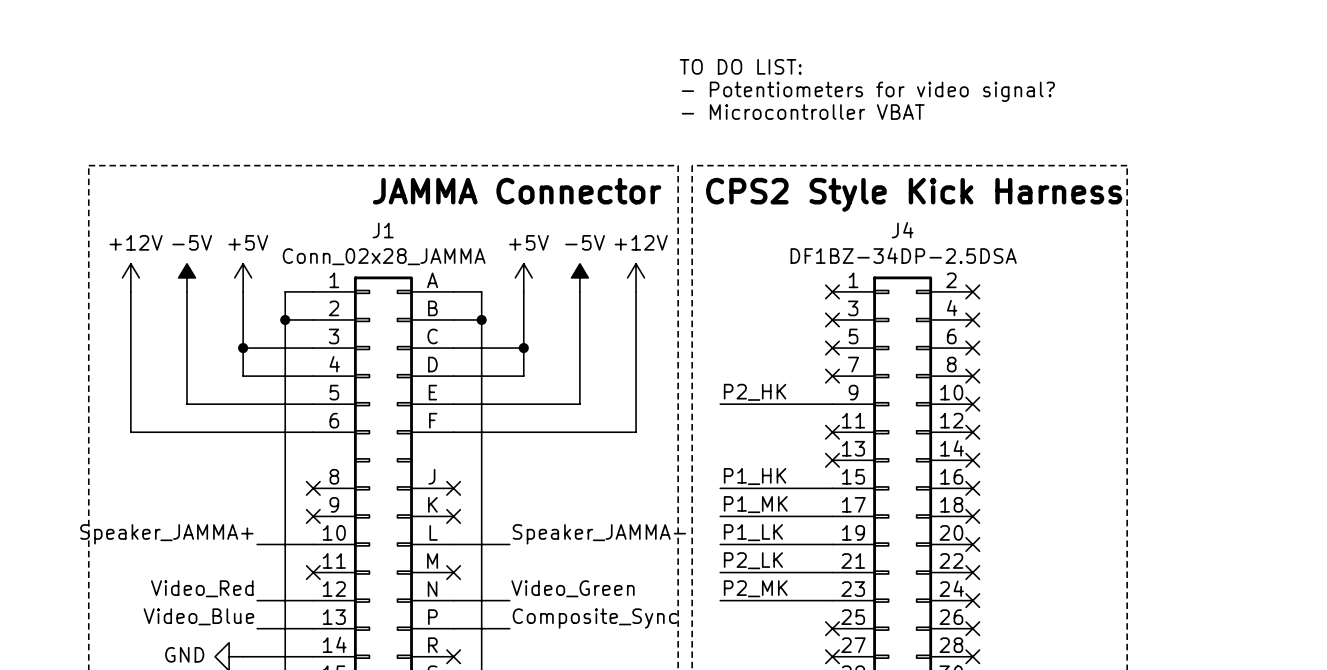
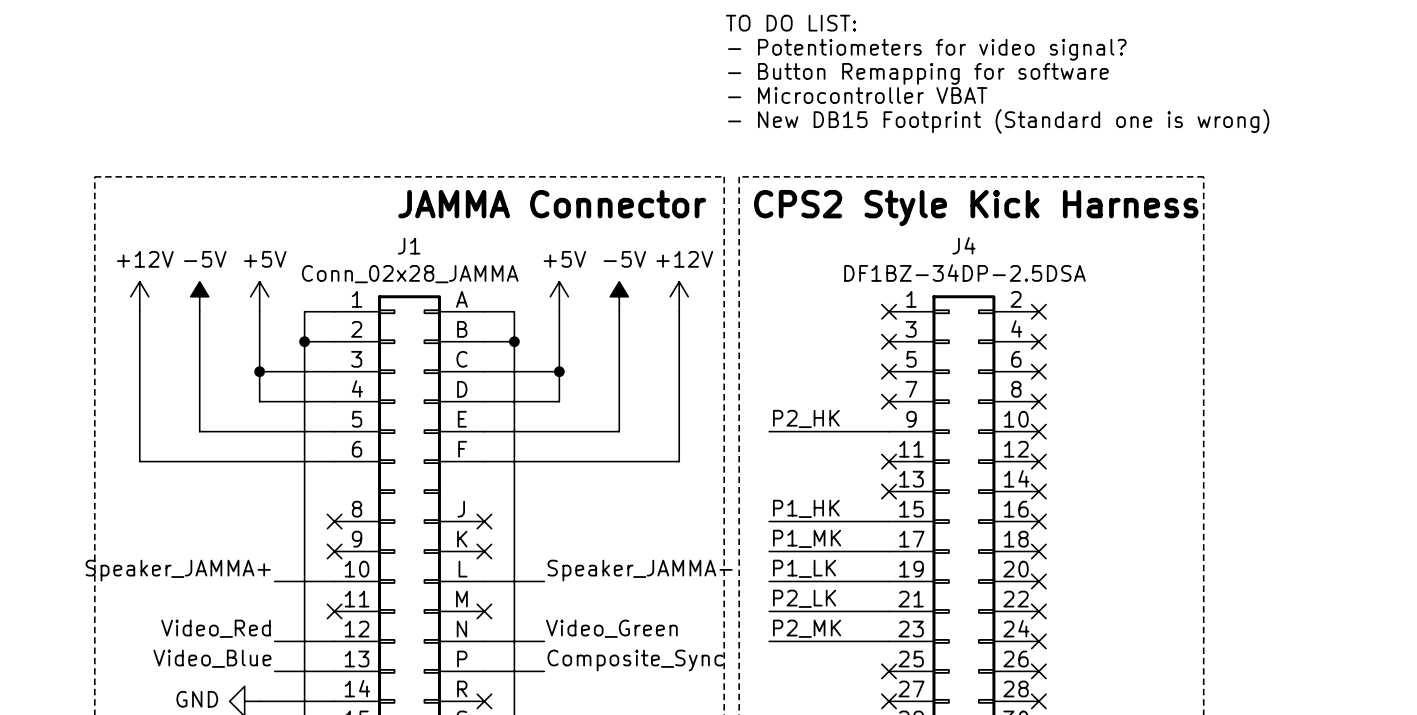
text: none -> TO DO LIST: (791, 23)
text: none -> - Potentiometers for video signal? (927, 49)
text: TO DO LIST: (740, 66) -> - Button Remapping for software (918, 73)
text: - Potentiometers for video signal? (868, 91) -> - Microcontroller VBAT (857, 95)
text: - Microcontroller VBAT (803, 112) -> - New DB15 Footprint (Standard one is wrong) (998, 121)

